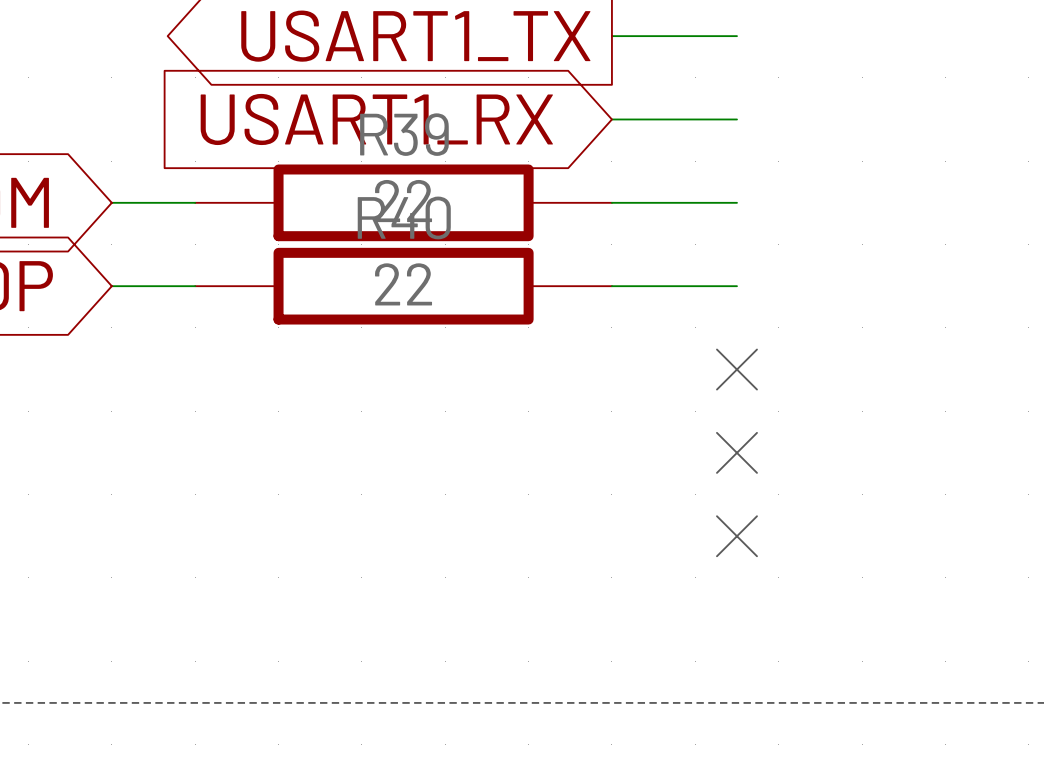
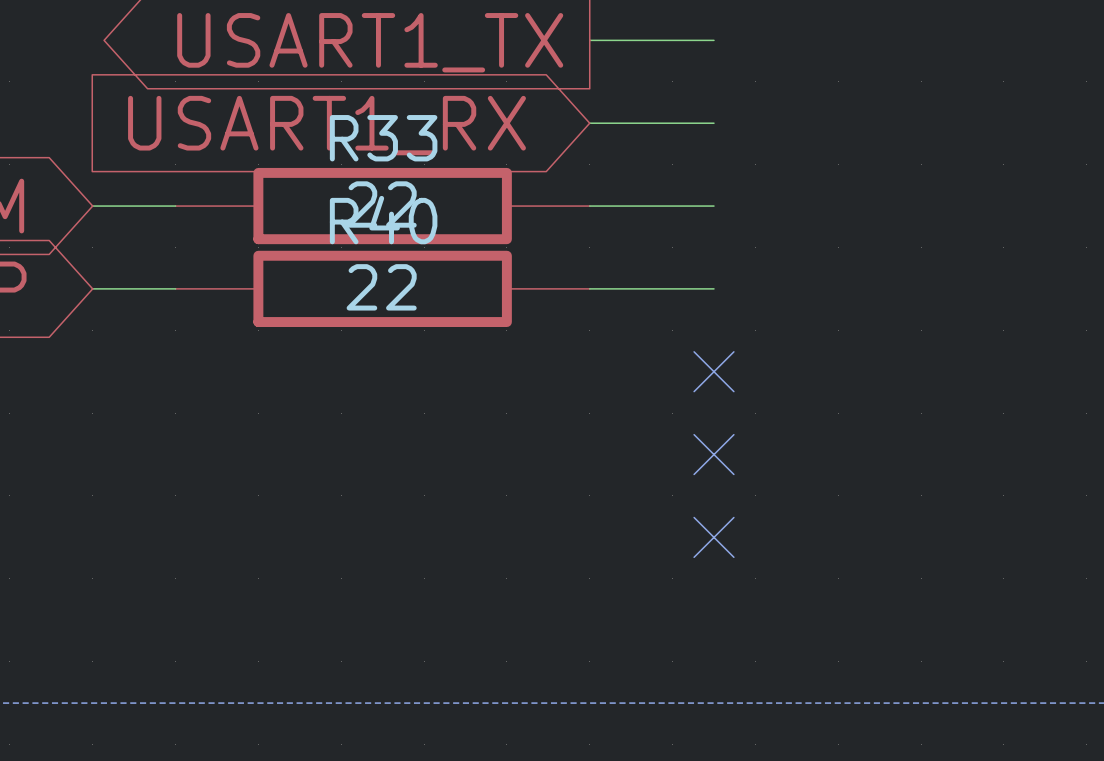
R39 name: R39 (404, 134) -> R33 (383, 138)

